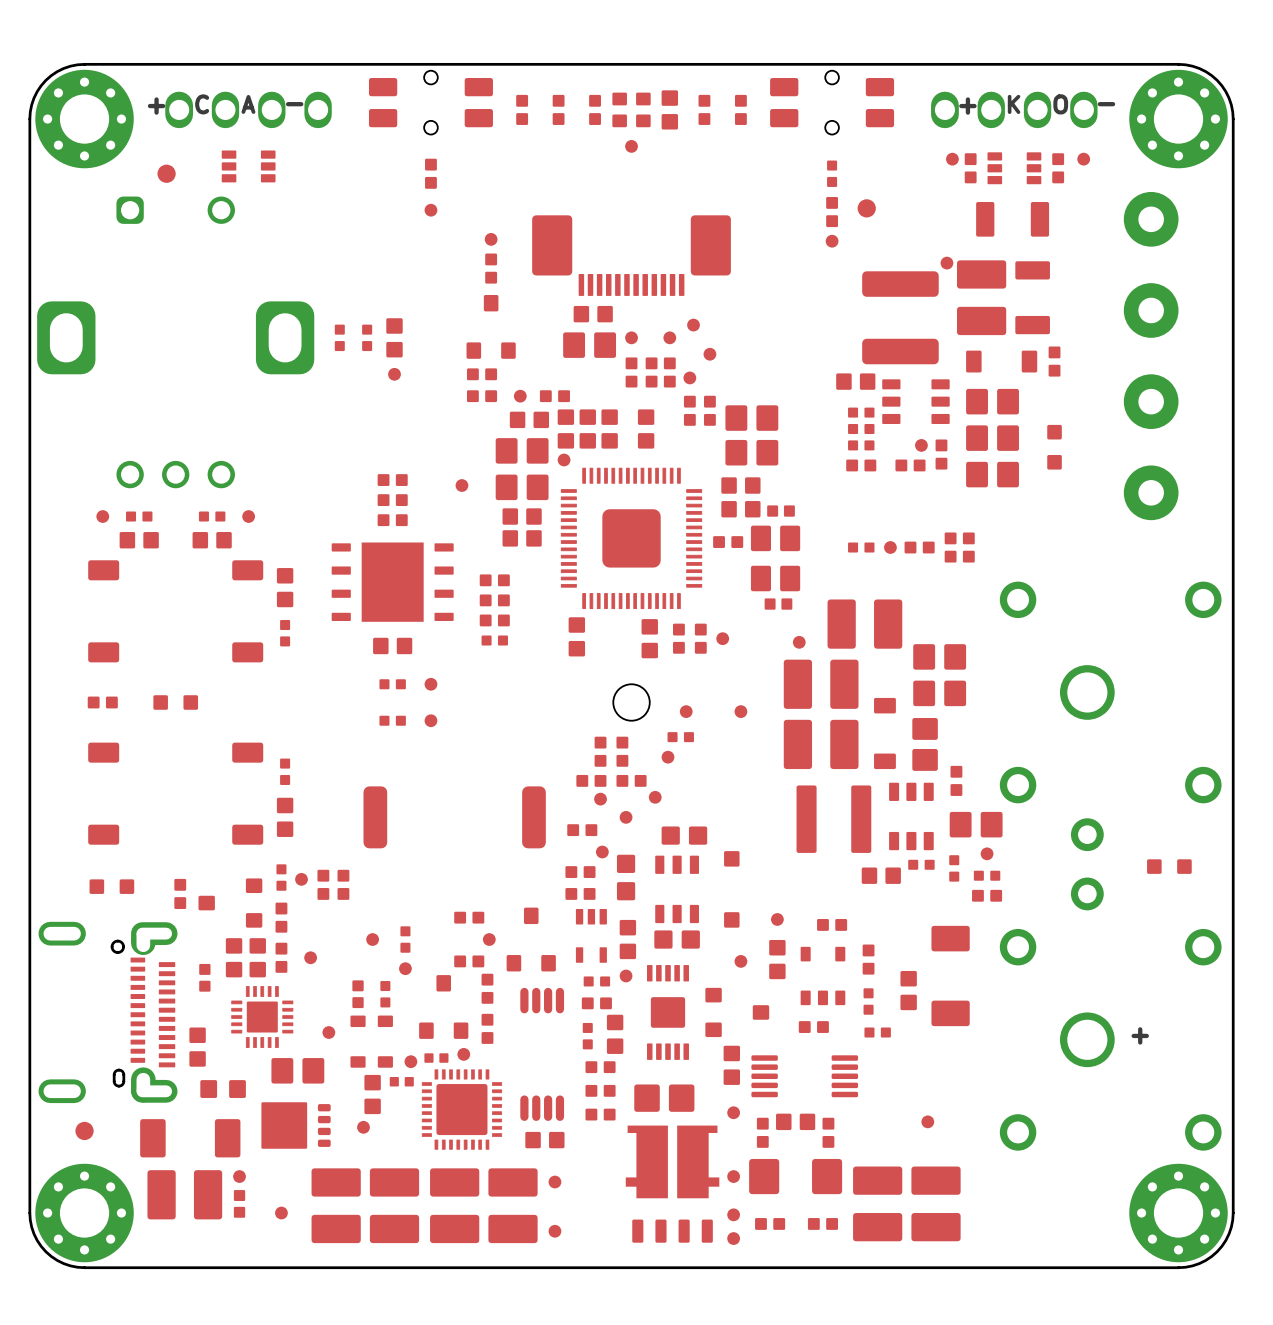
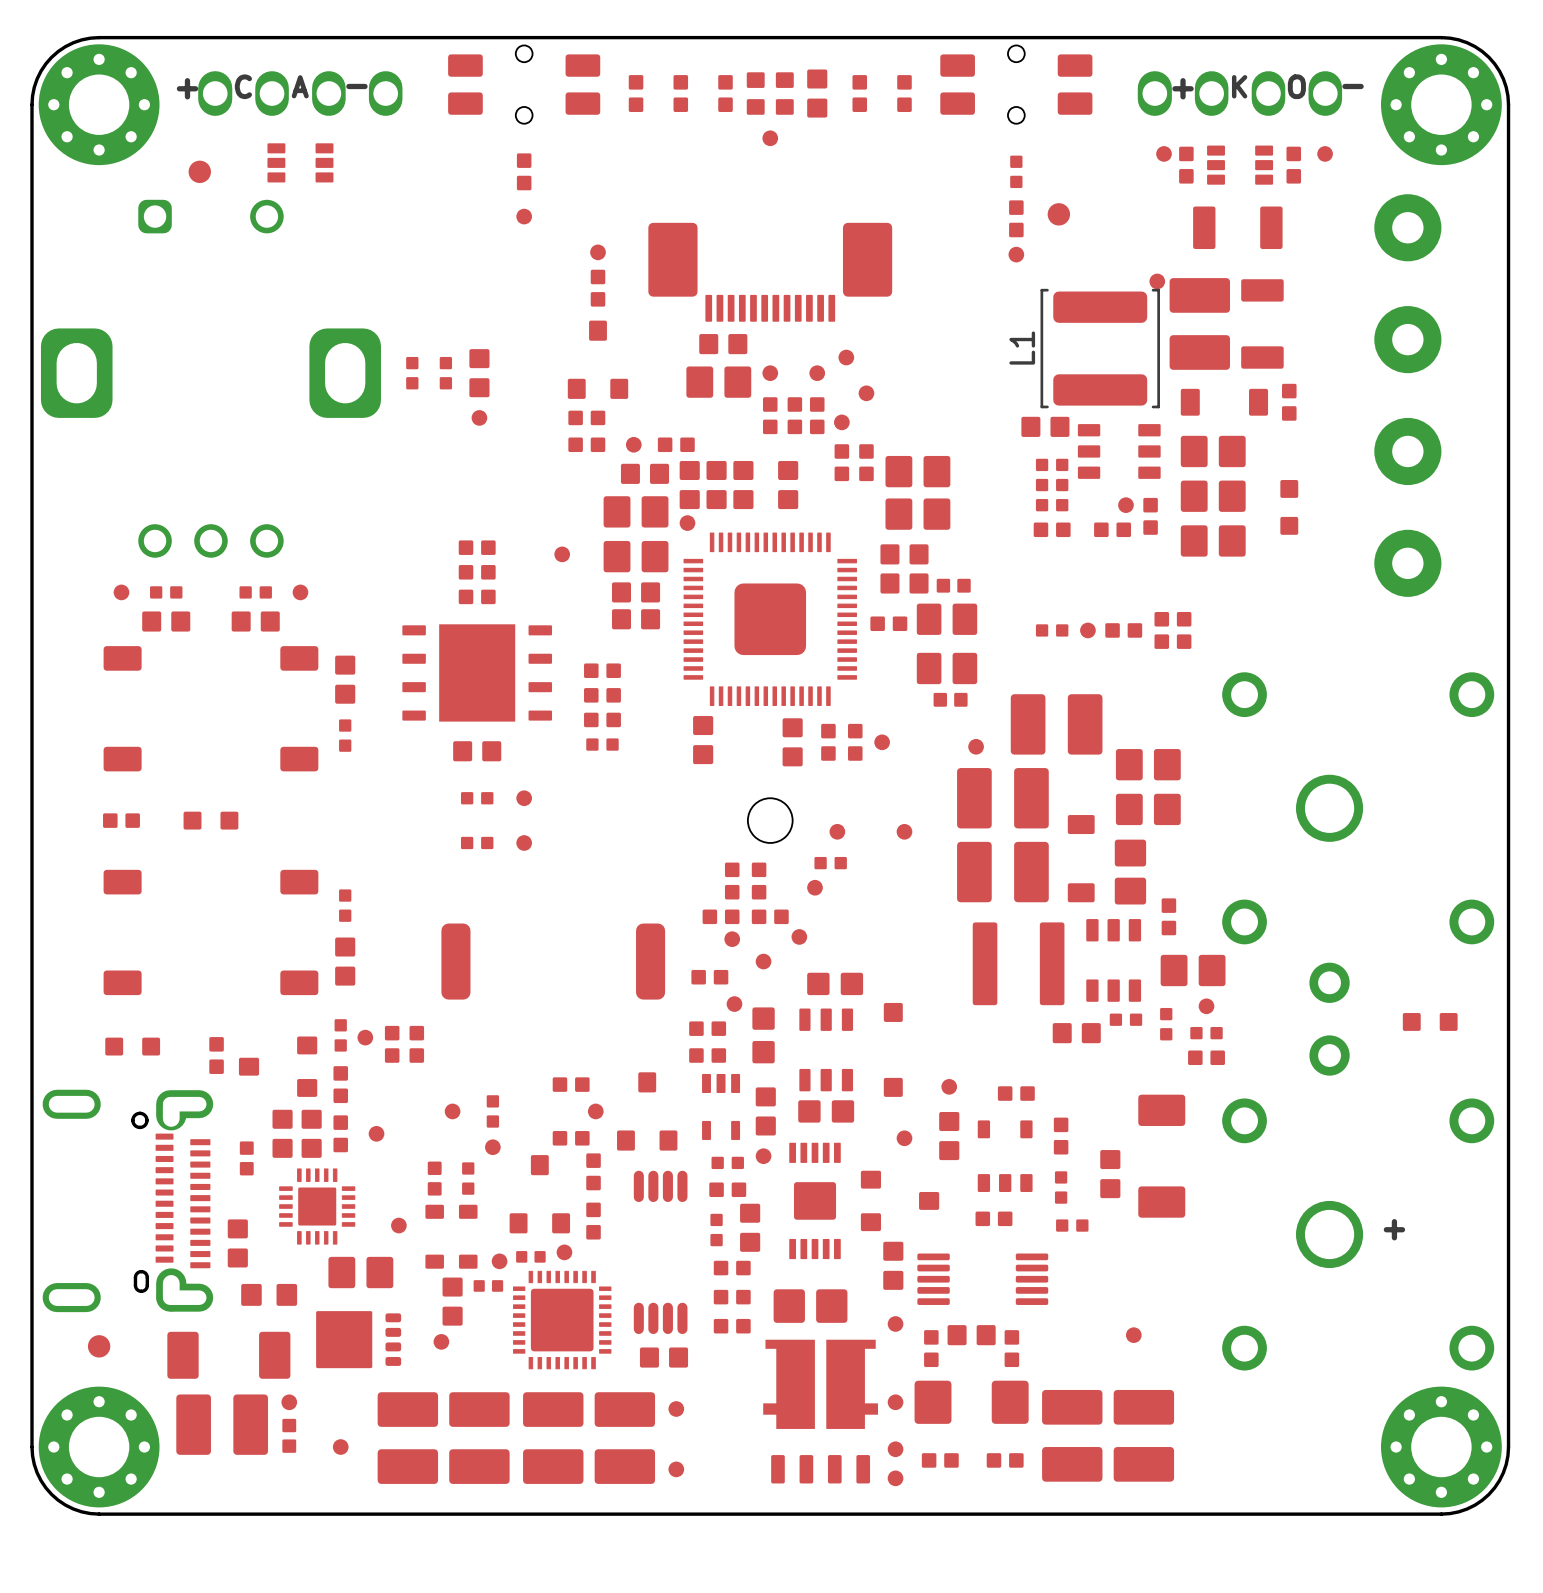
L1: none -> (1100, 348)

